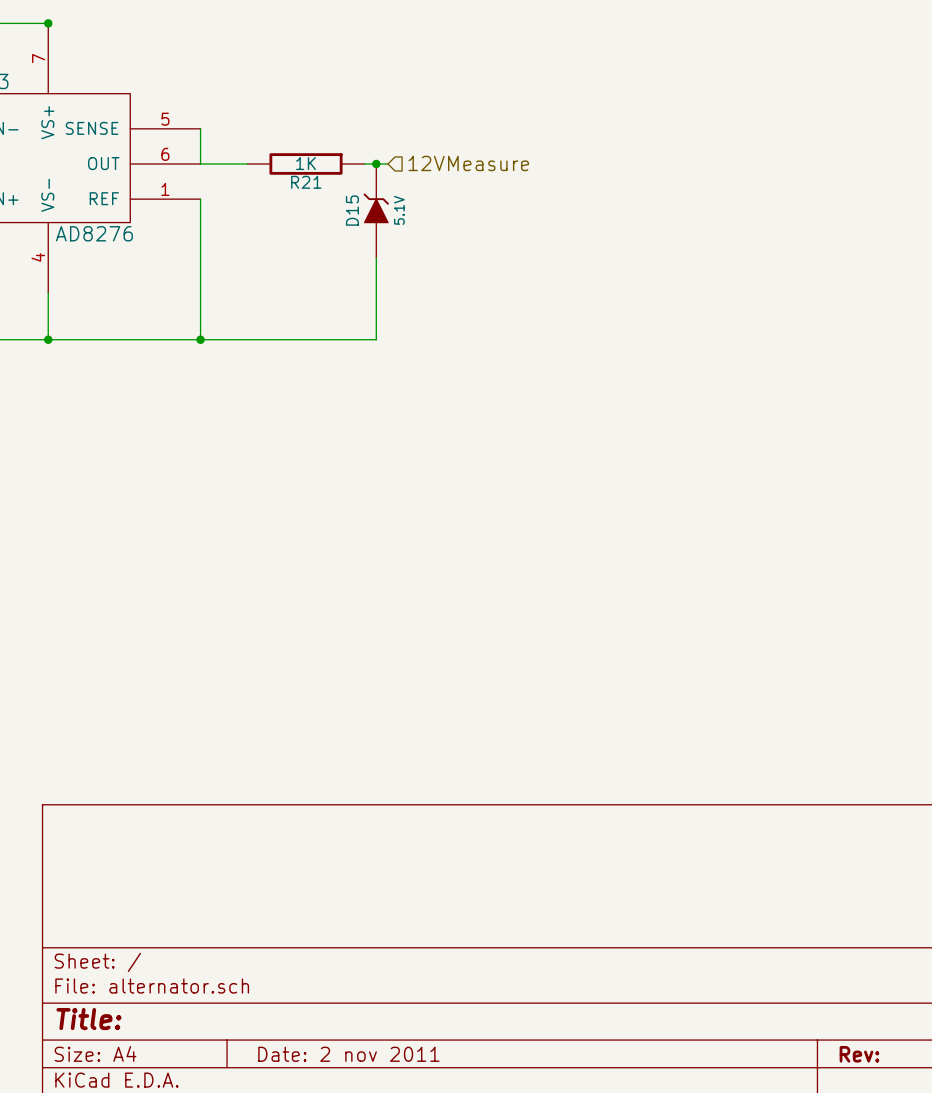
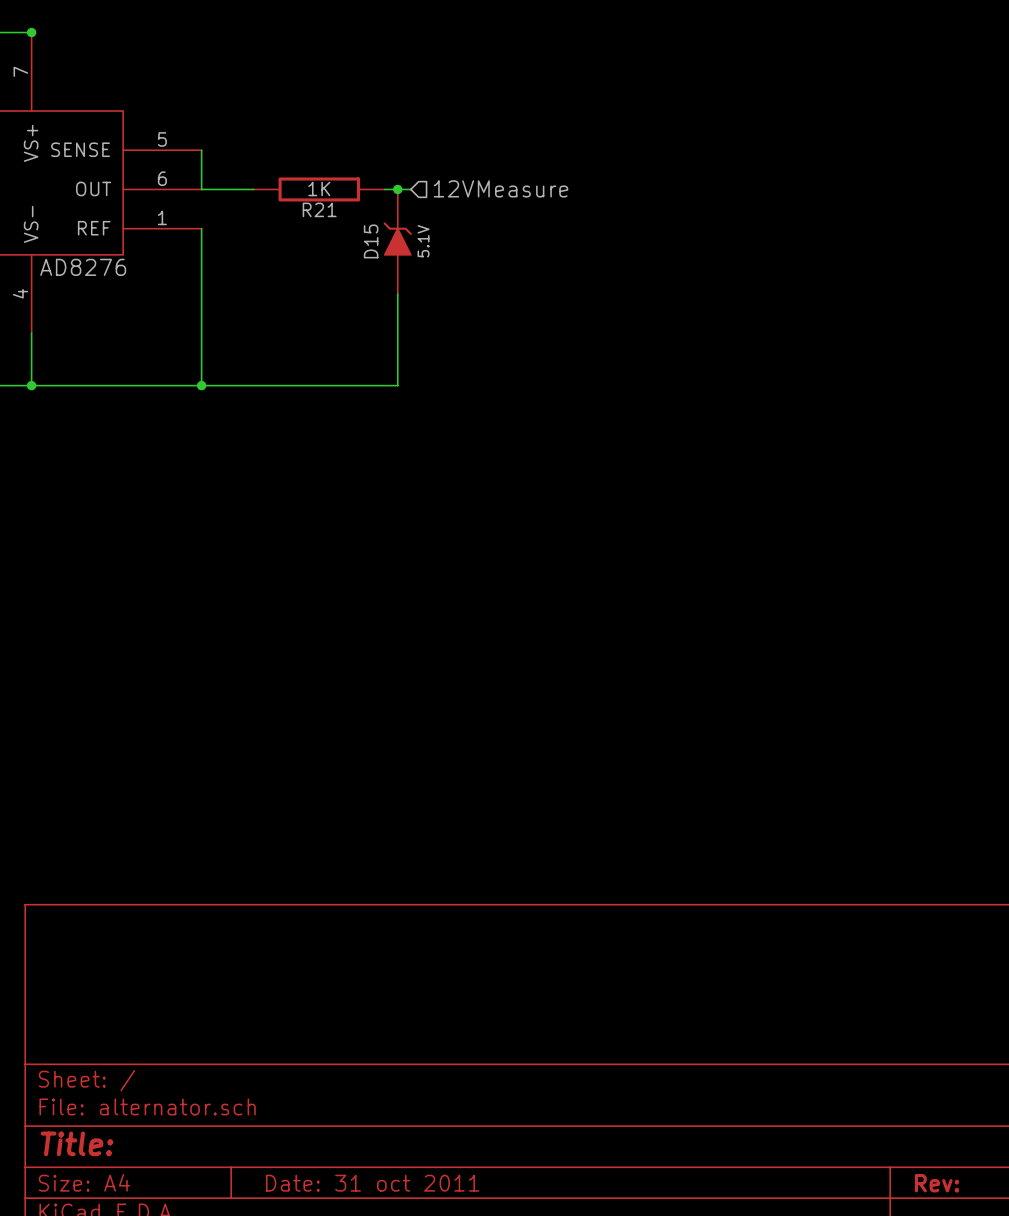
title block: Date: 2 nov 2011 (348, 1054) -> Date: 31 oct 2011 (372, 1183)

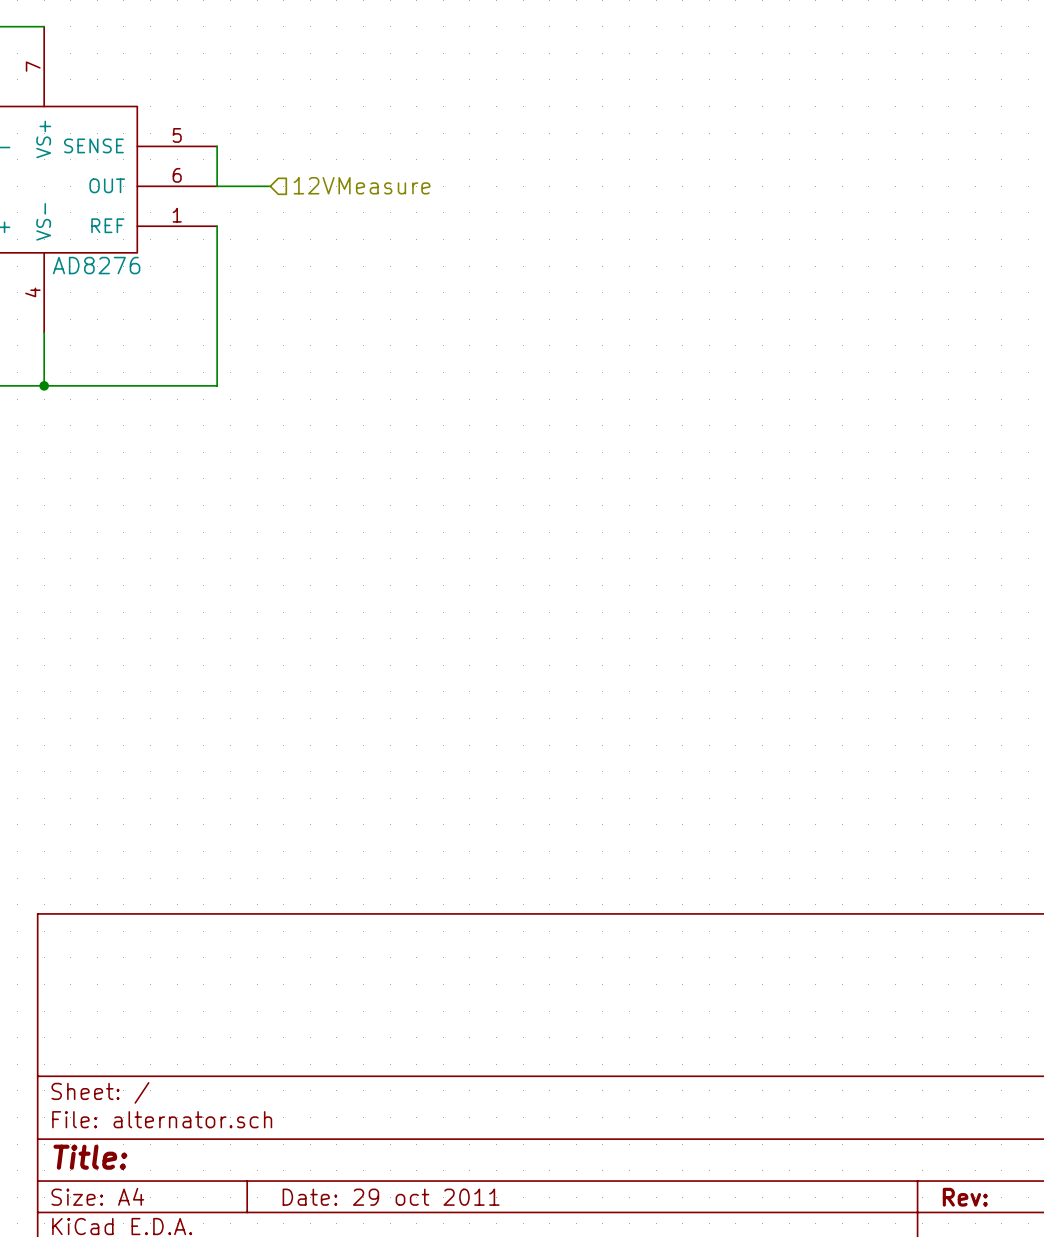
junction: (31, 32) -> none
hierarchical label position: 12VMeasure (500, 188) -> 12VMeasure (362, 185)
R21: 1K (319, 189) -> none
wire: (384, 189) (410, 189) -> none
junction: (397, 189) -> none
D15: 5.1V (397, 241) -> none
wire: (397, 294) (397, 385) (201, 385) -> none
junction: (201, 385) -> none
title block: Date: 31 oct 2011 (372, 1183) -> Date: 29 oct 2011 (391, 1197)

